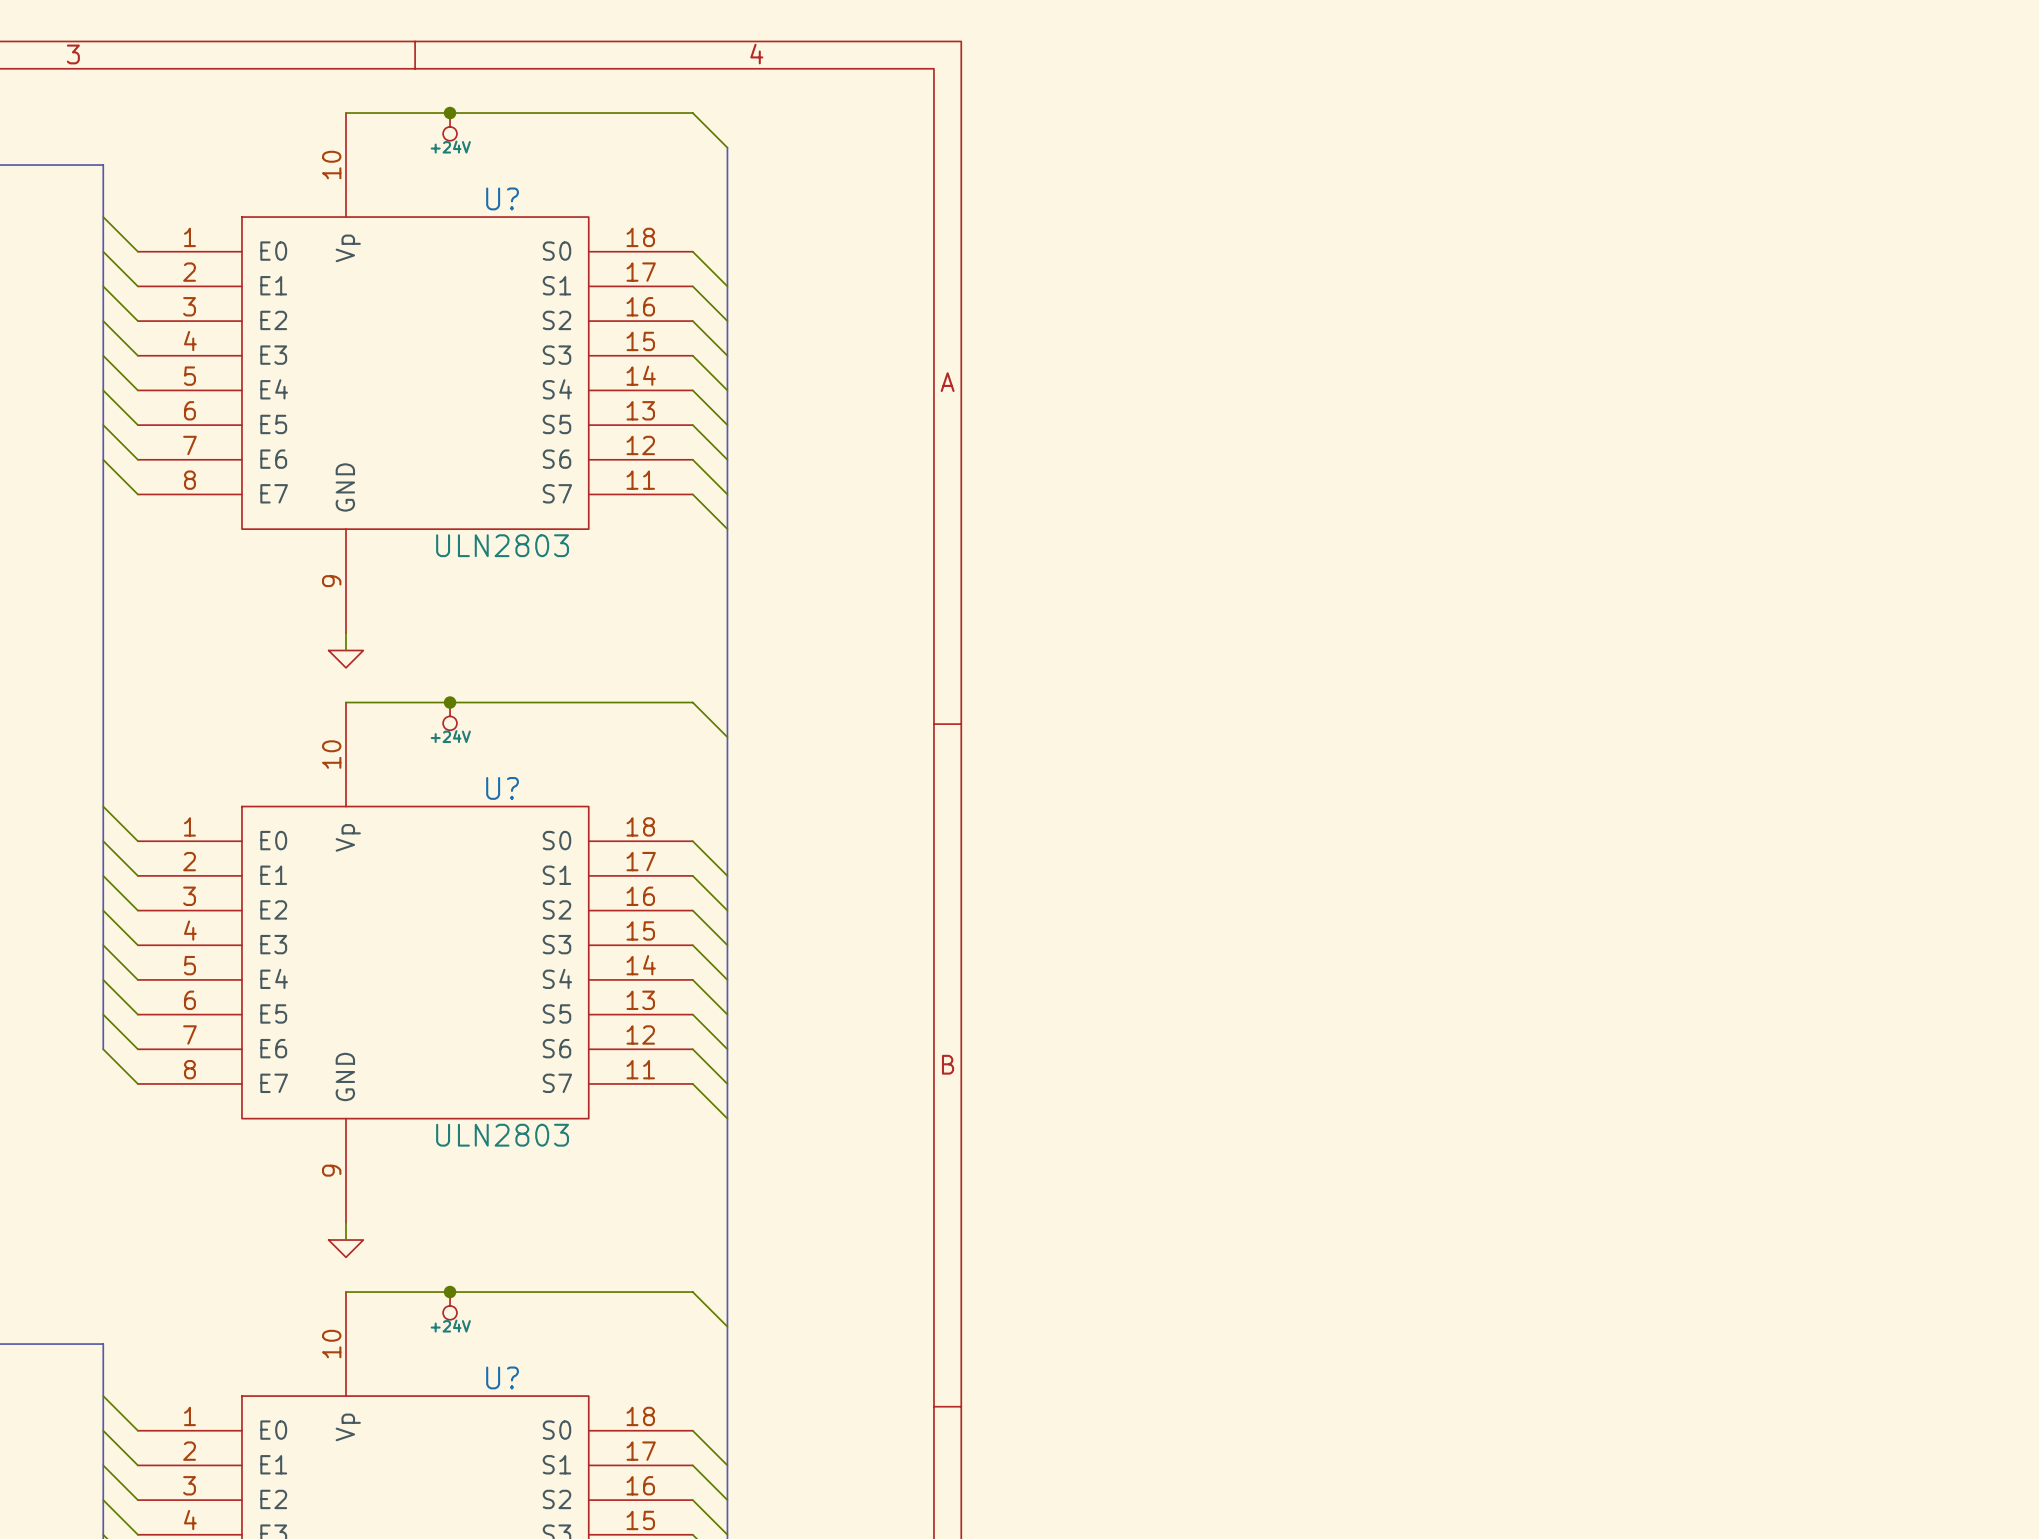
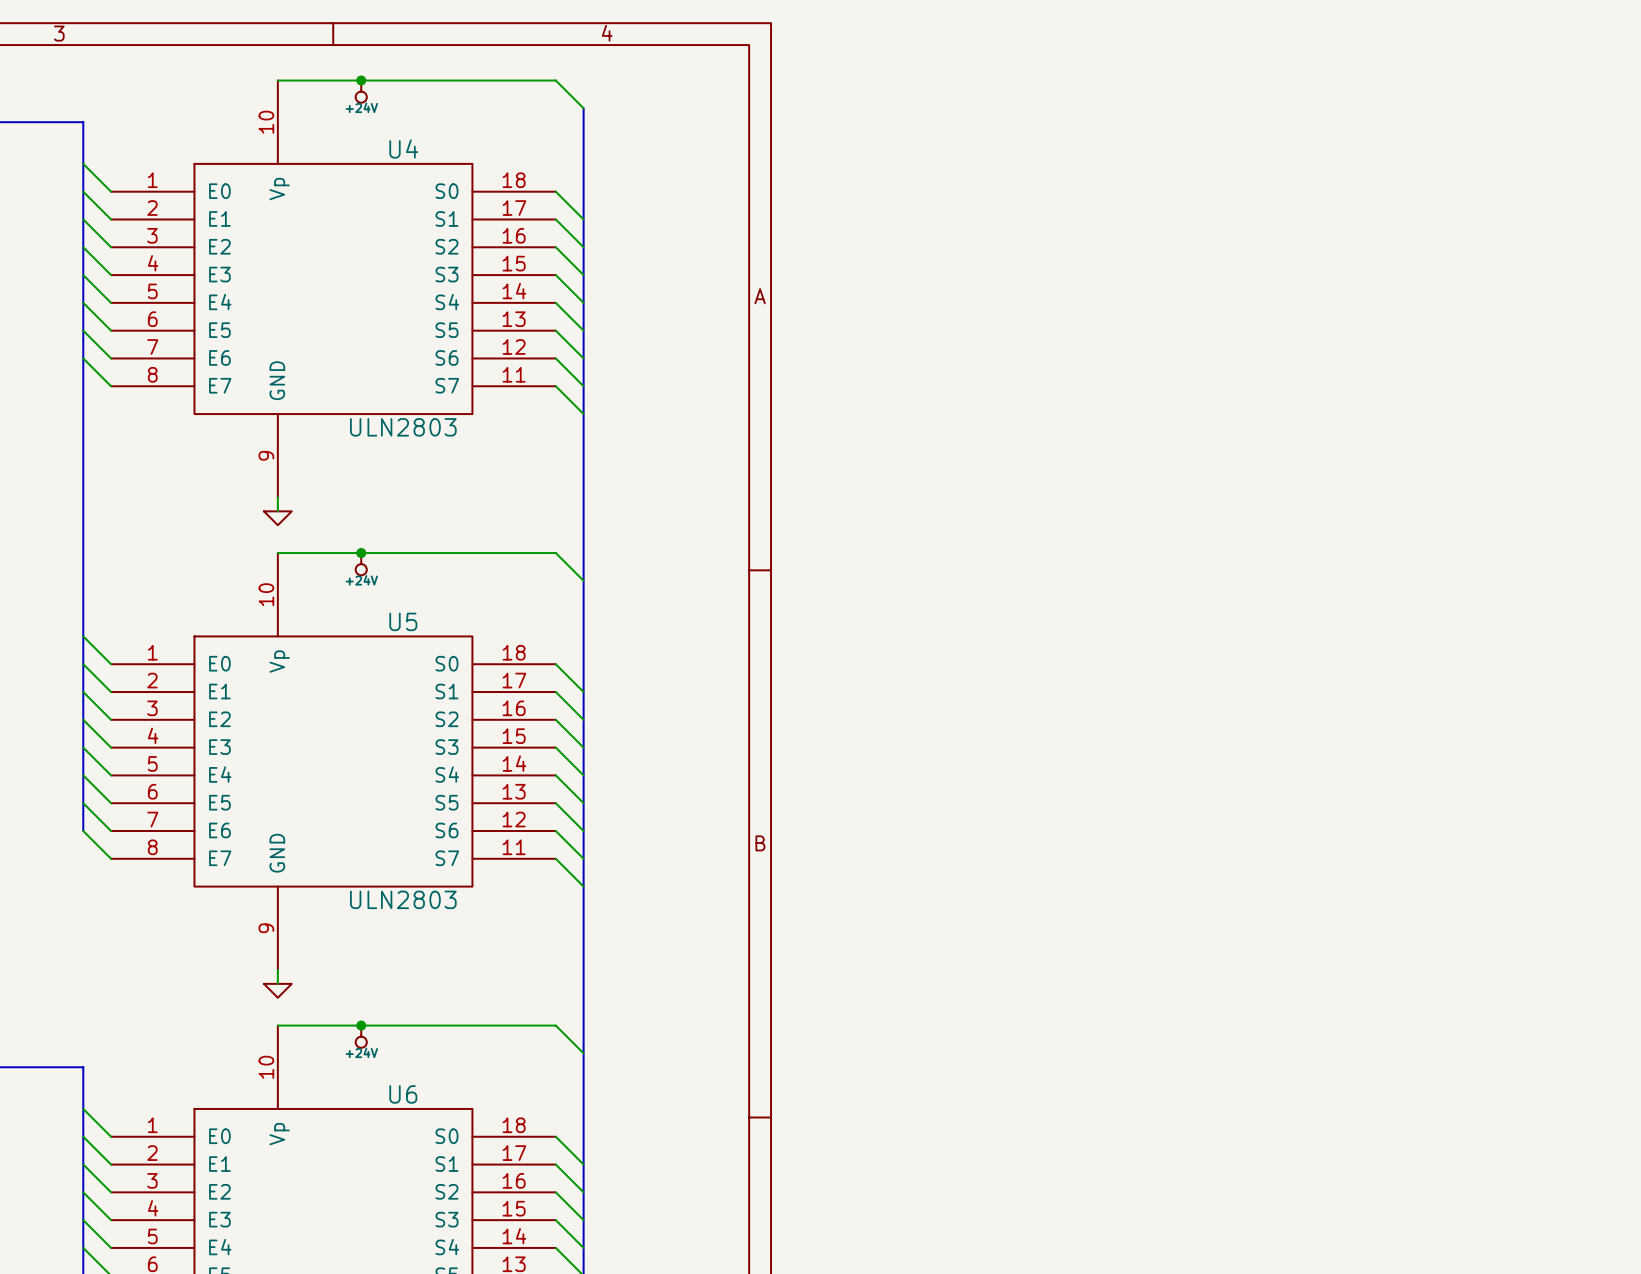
U? name: U? (502, 198) -> U4 (403, 148)
U? name: U? (502, 788) -> U5 (403, 621)
U? name: U? (502, 1377) -> U6 (403, 1094)

